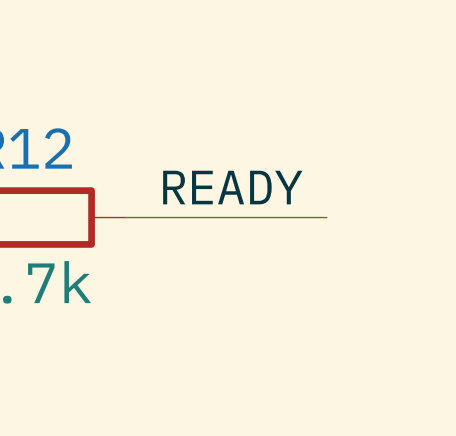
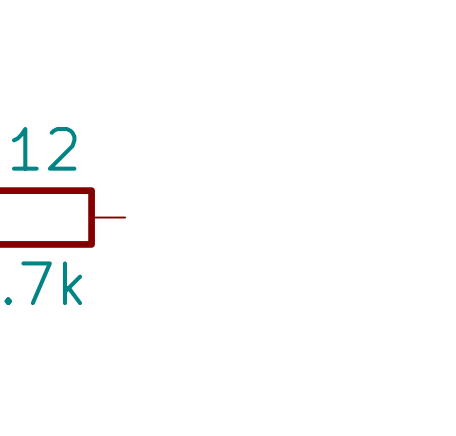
label: READY (232, 187) -> none
wire: (125, 217) (326, 217) -> none

